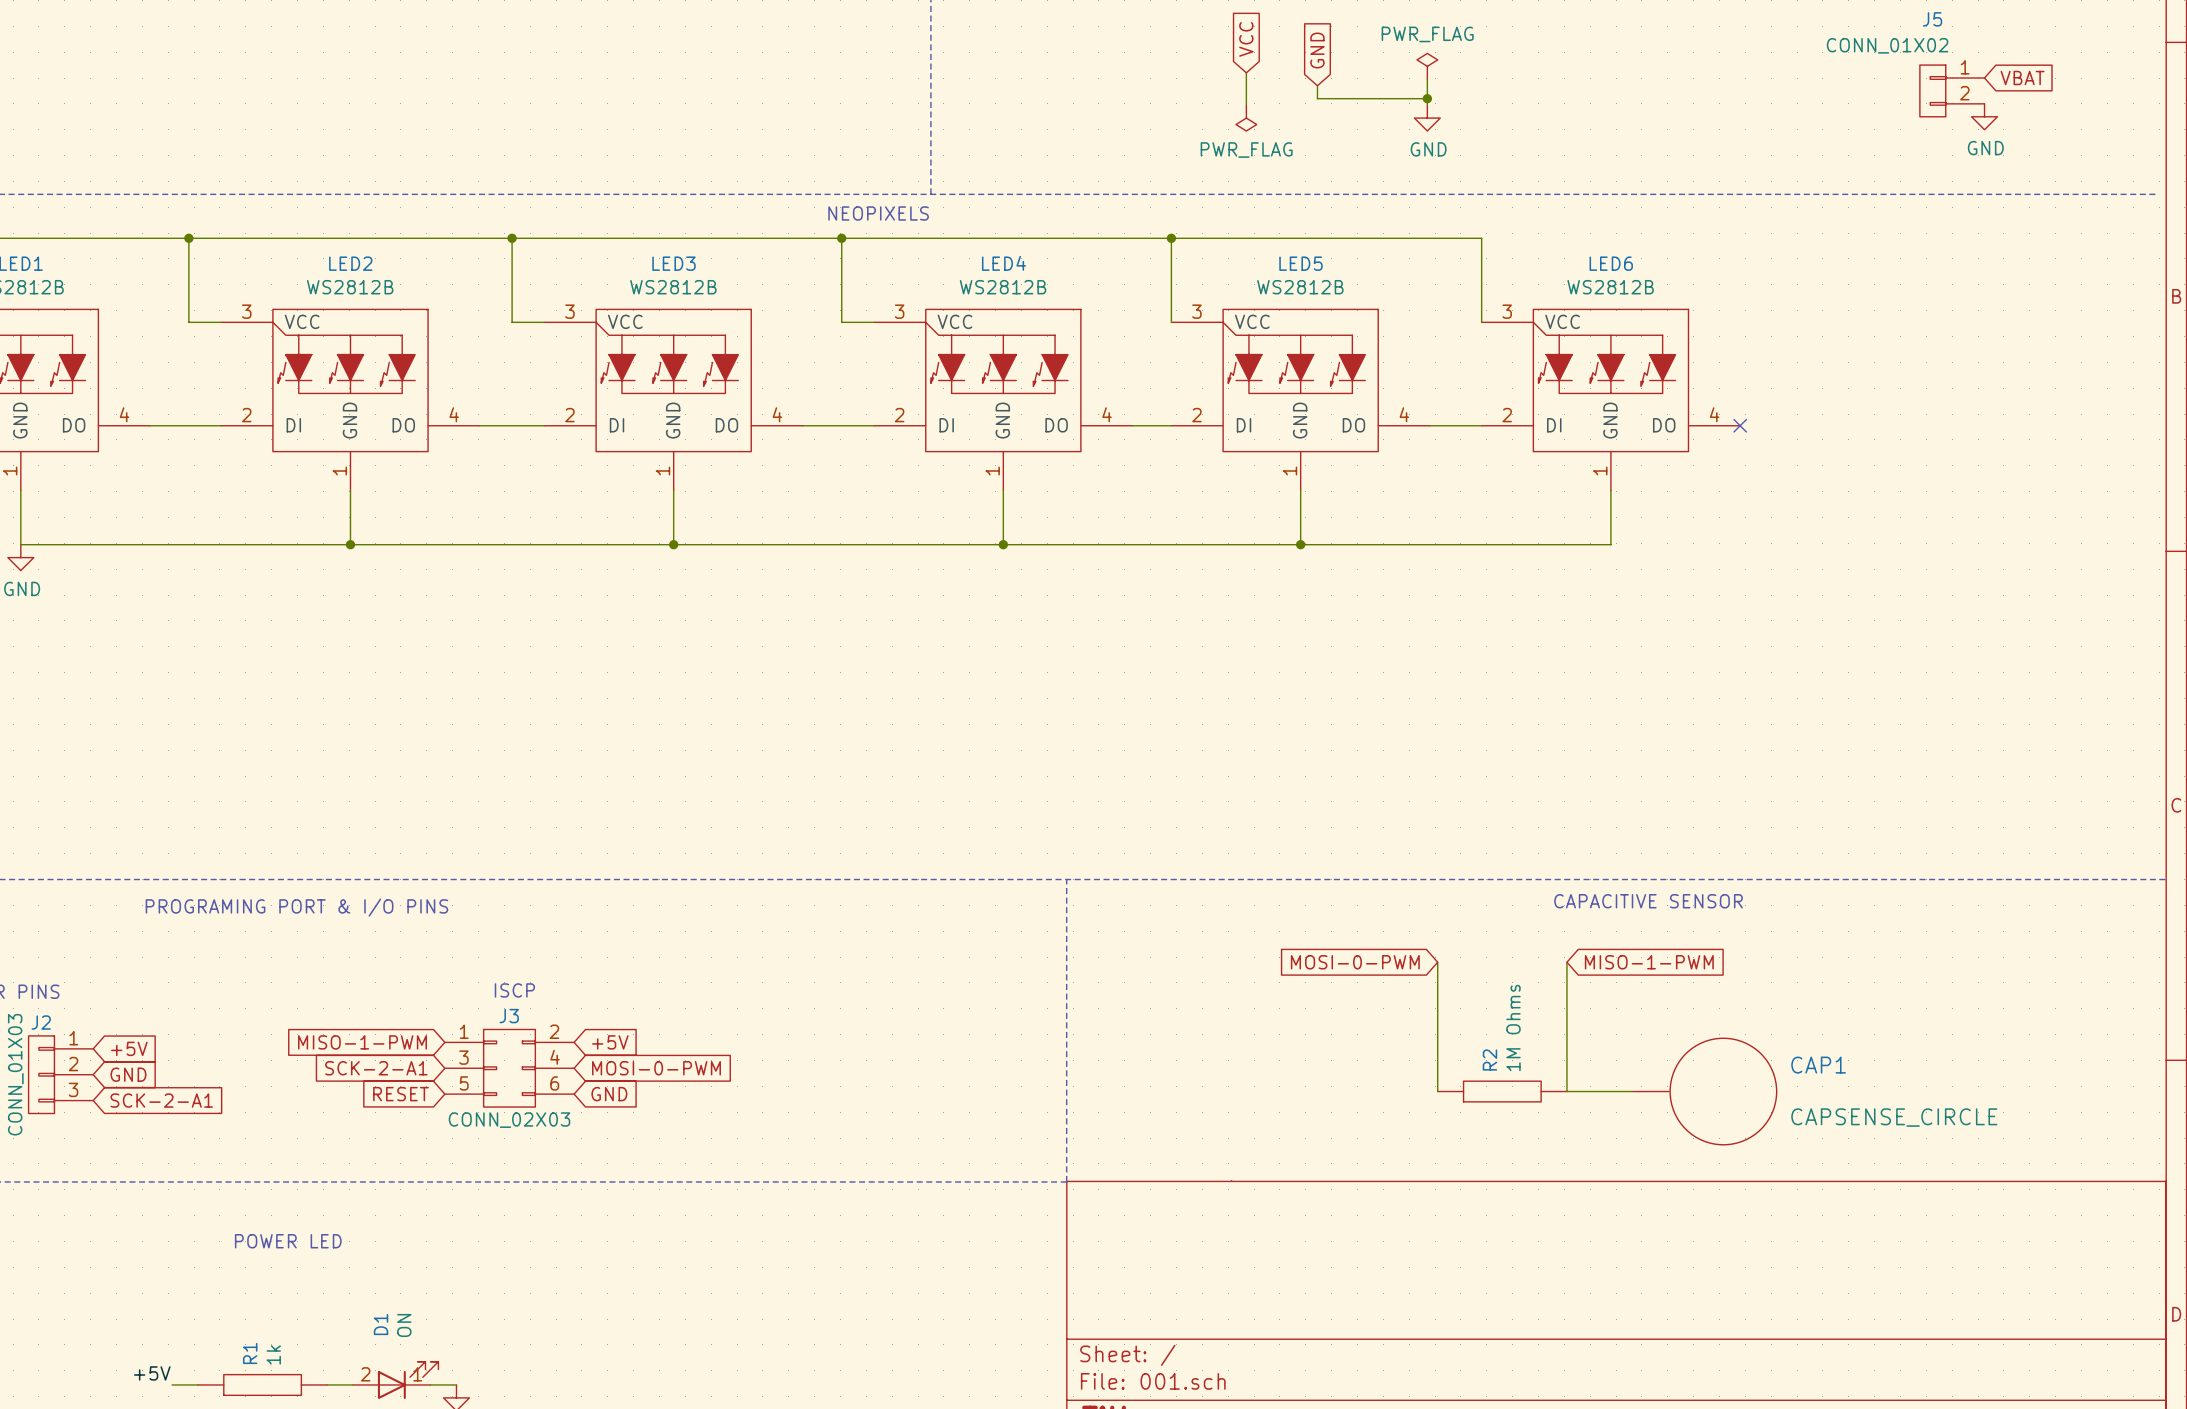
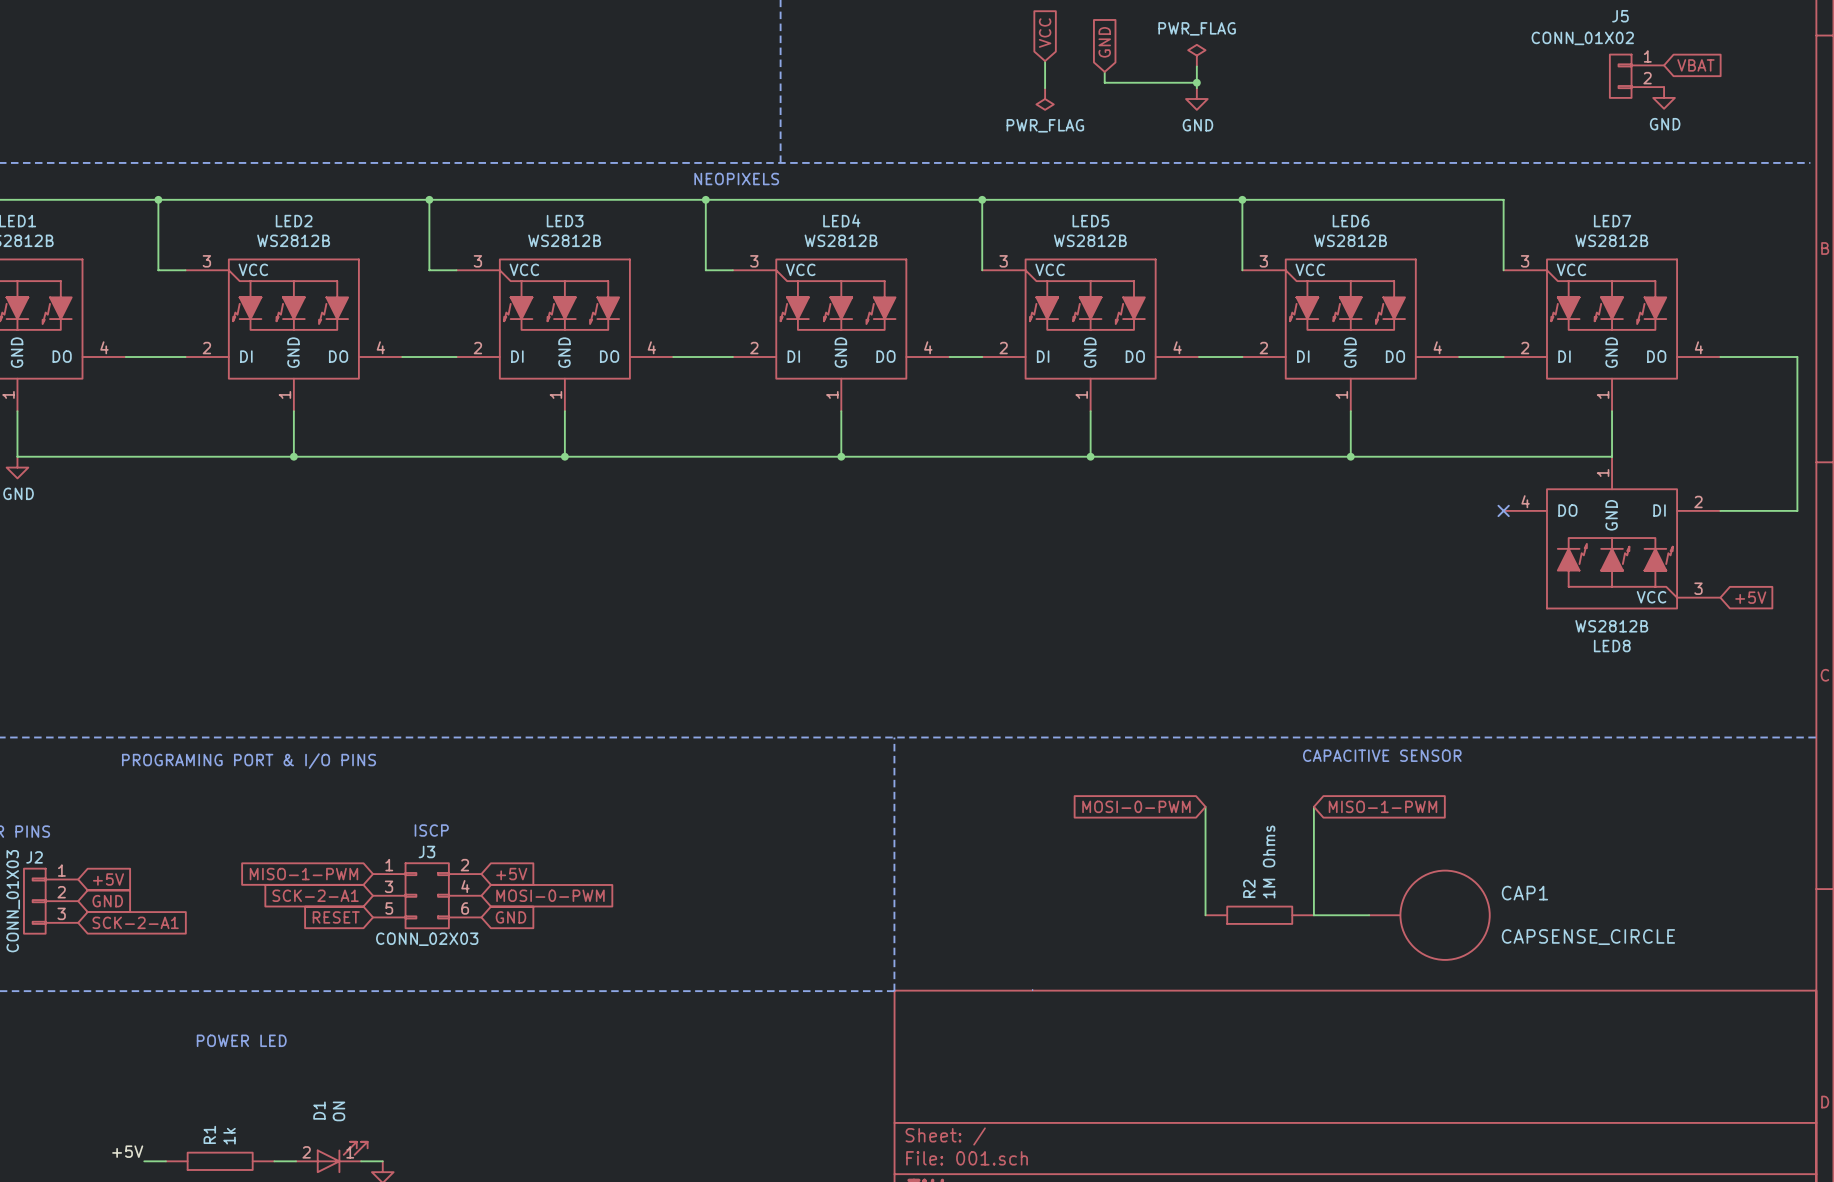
wire: none -> (1242, 199) (1503, 199) (1503, 270)
junction: none -> (1242, 199)
LED7: none -> WS2812B (1612, 335)
wire: none -> (1459, 357) (1503, 357)
no-connect mark: (1740, 425) -> none
wire: none -> (1720, 357) (1797, 357) (1797, 510) (1720, 510)
wire: none -> (1612, 411) (1612, 456) (1350, 456)
junction: none -> (1350, 456)
no-connect mark: none -> (1503, 510)
LED8: none -> WS2812B (1612, 532)
global label: none -> +5V (1750, 597)

